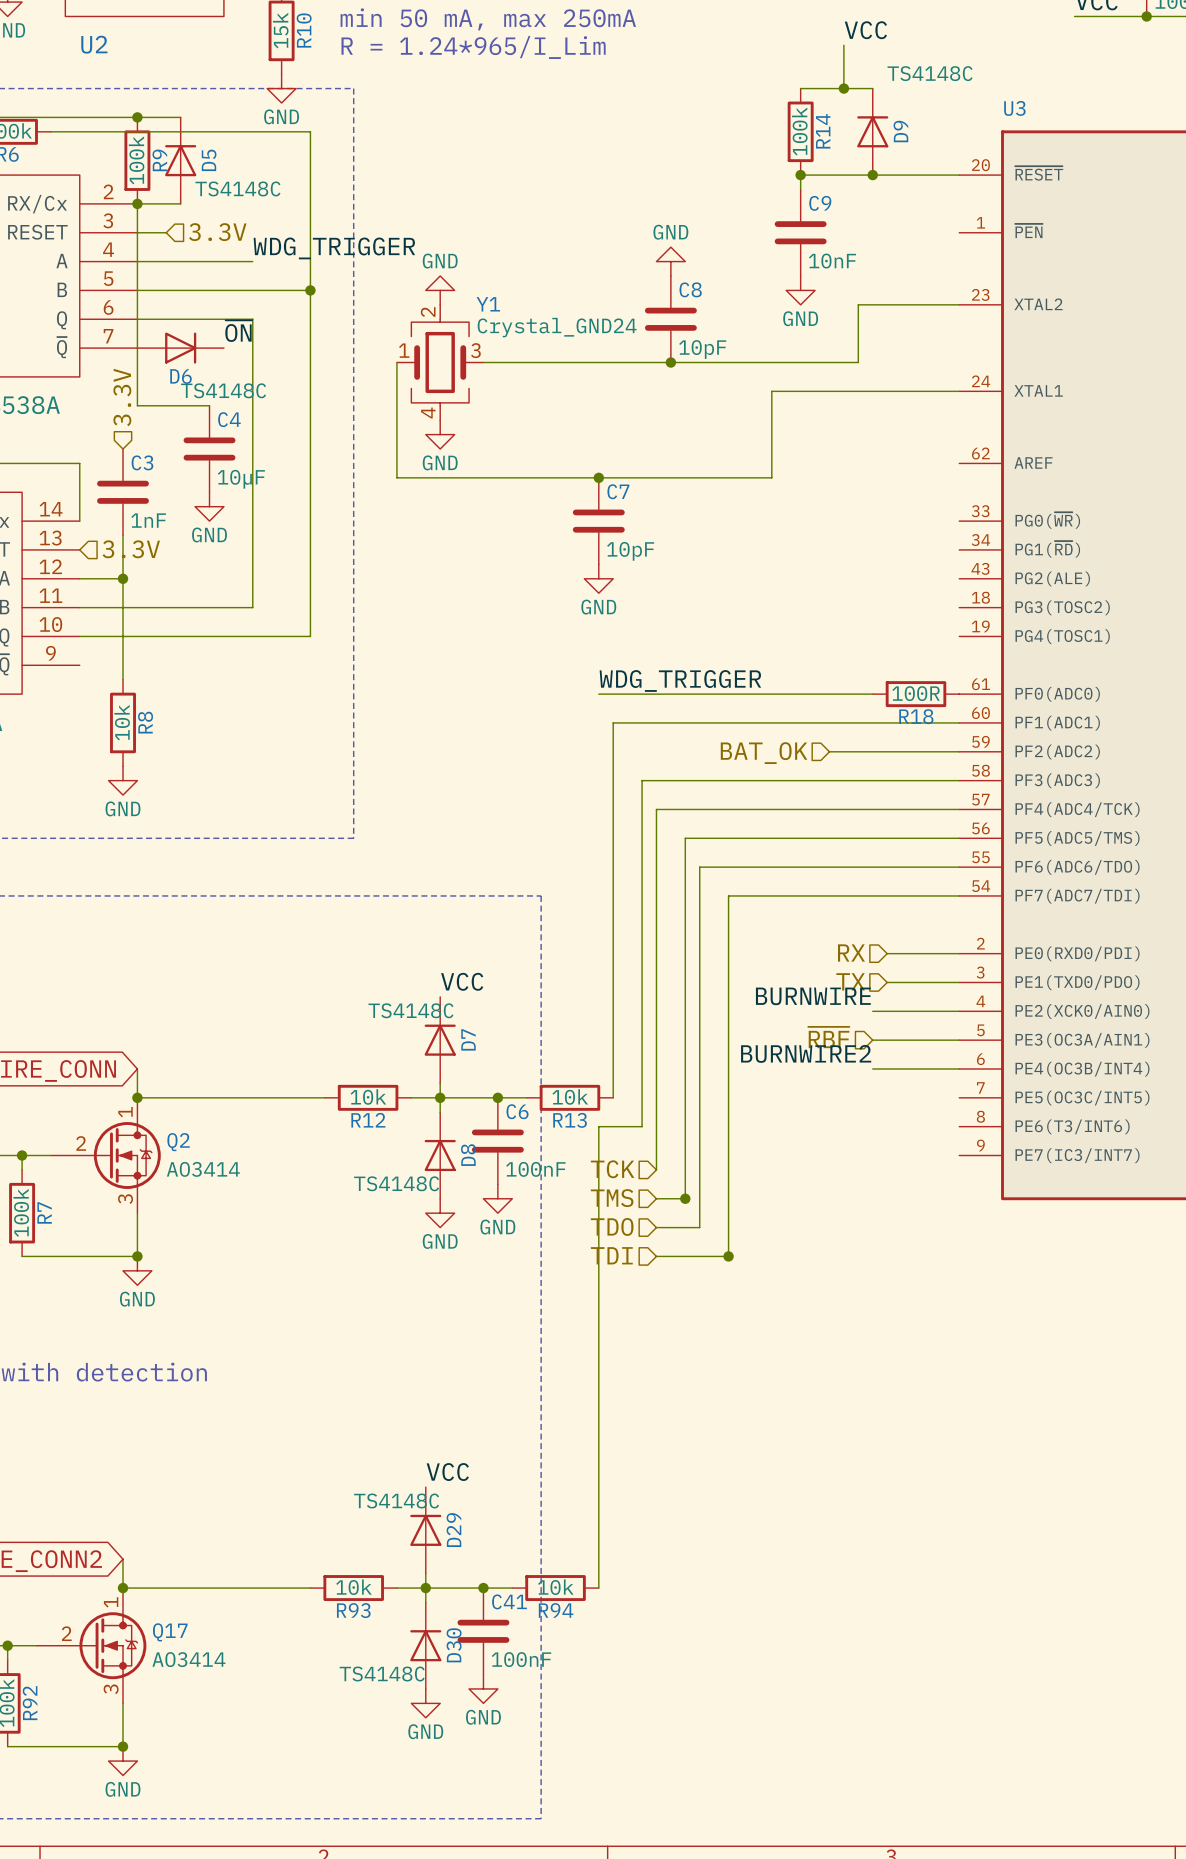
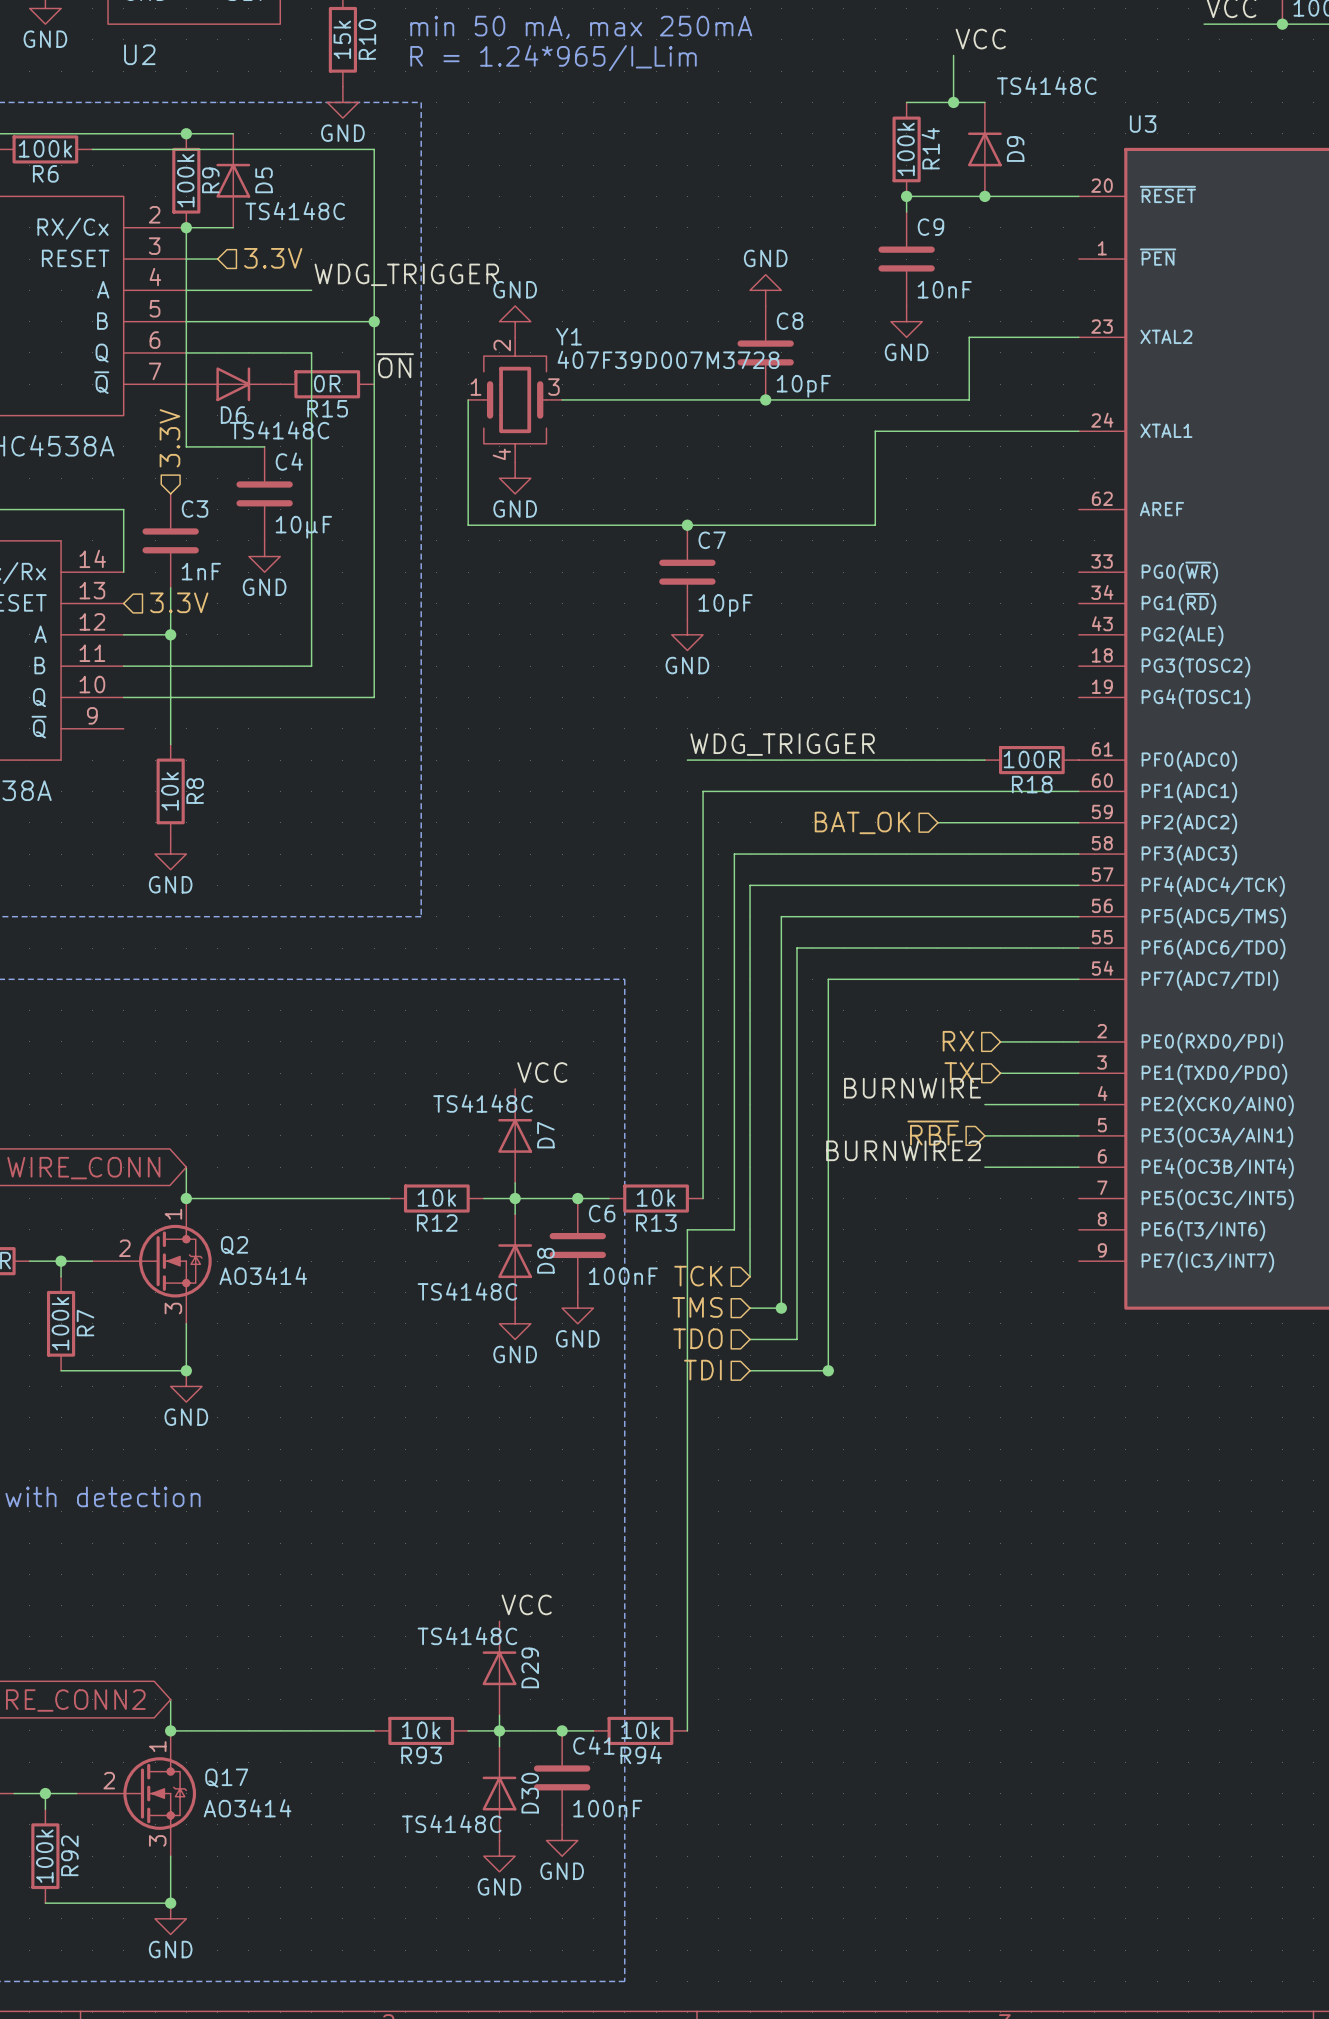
Y1 value: Crystal_GND24 (557, 327) -> 407F39D007M3728 (668, 359)
label position: ~{ON} (238, 331) -> ~{ON} (395, 365)
R15: none -> 0R (327, 384)

